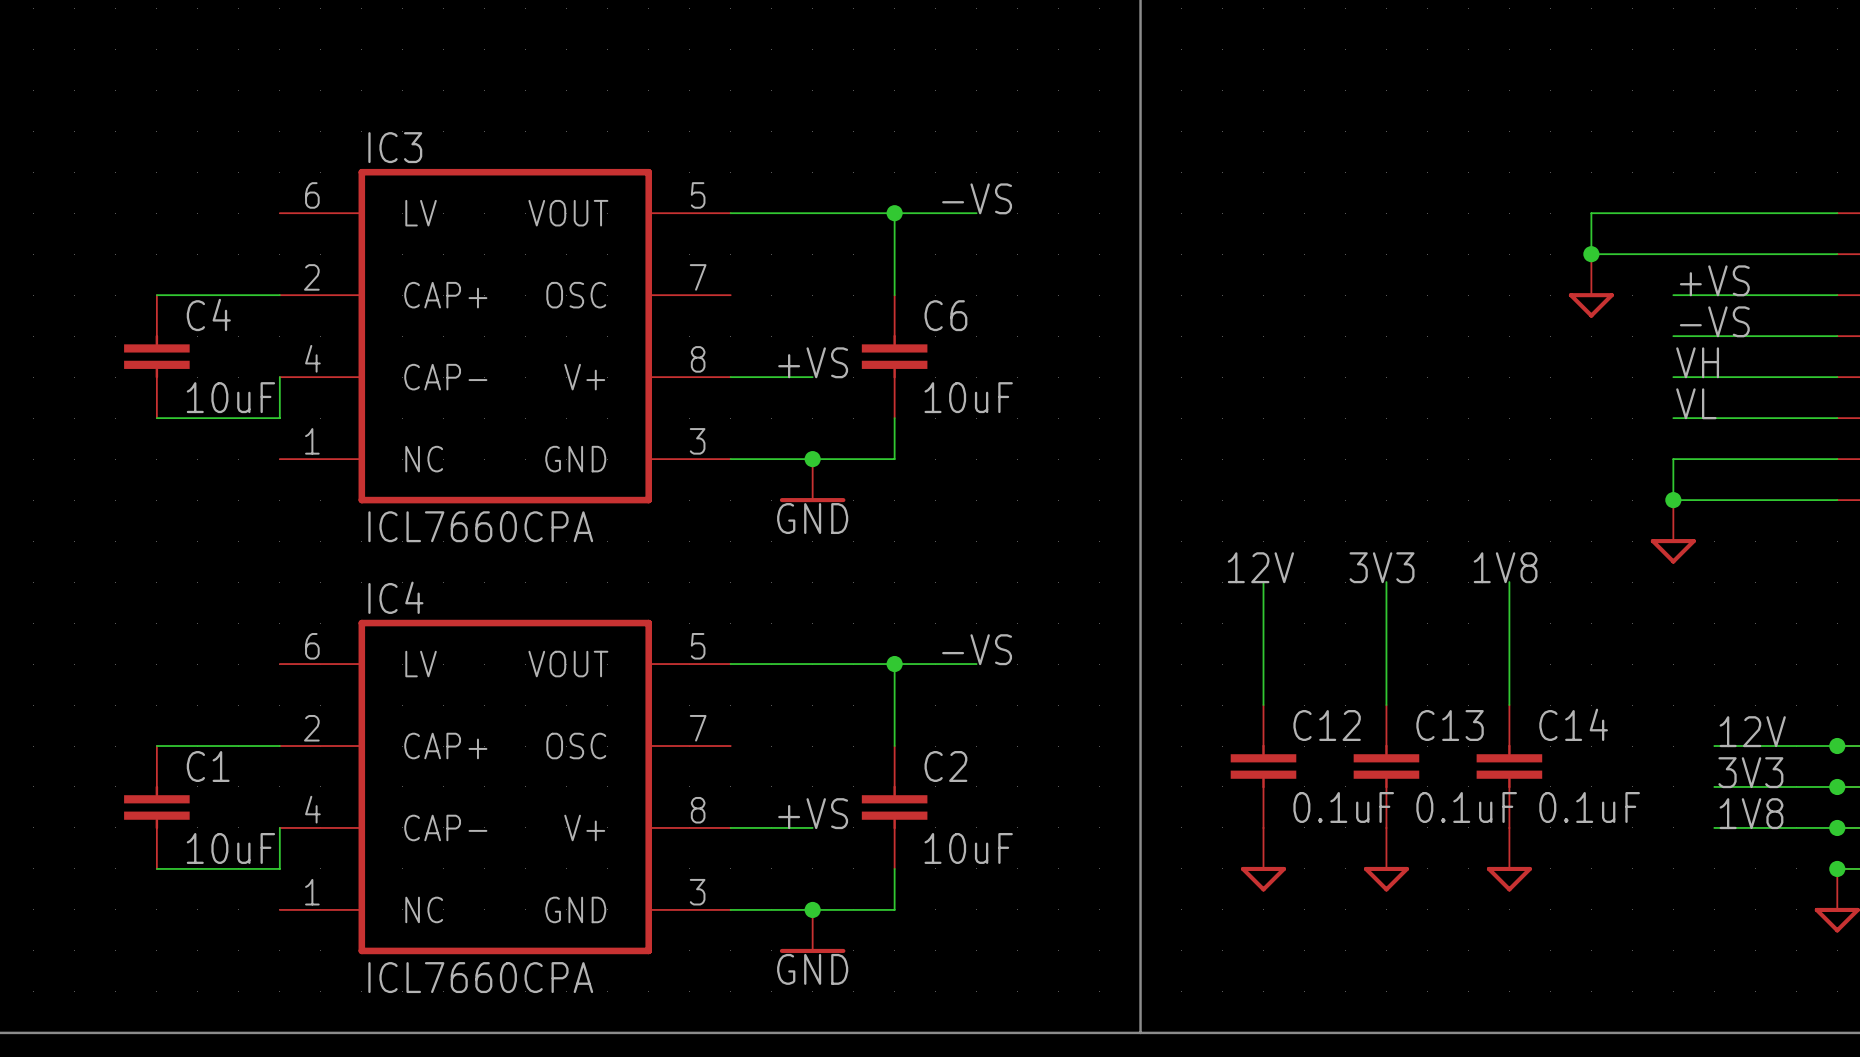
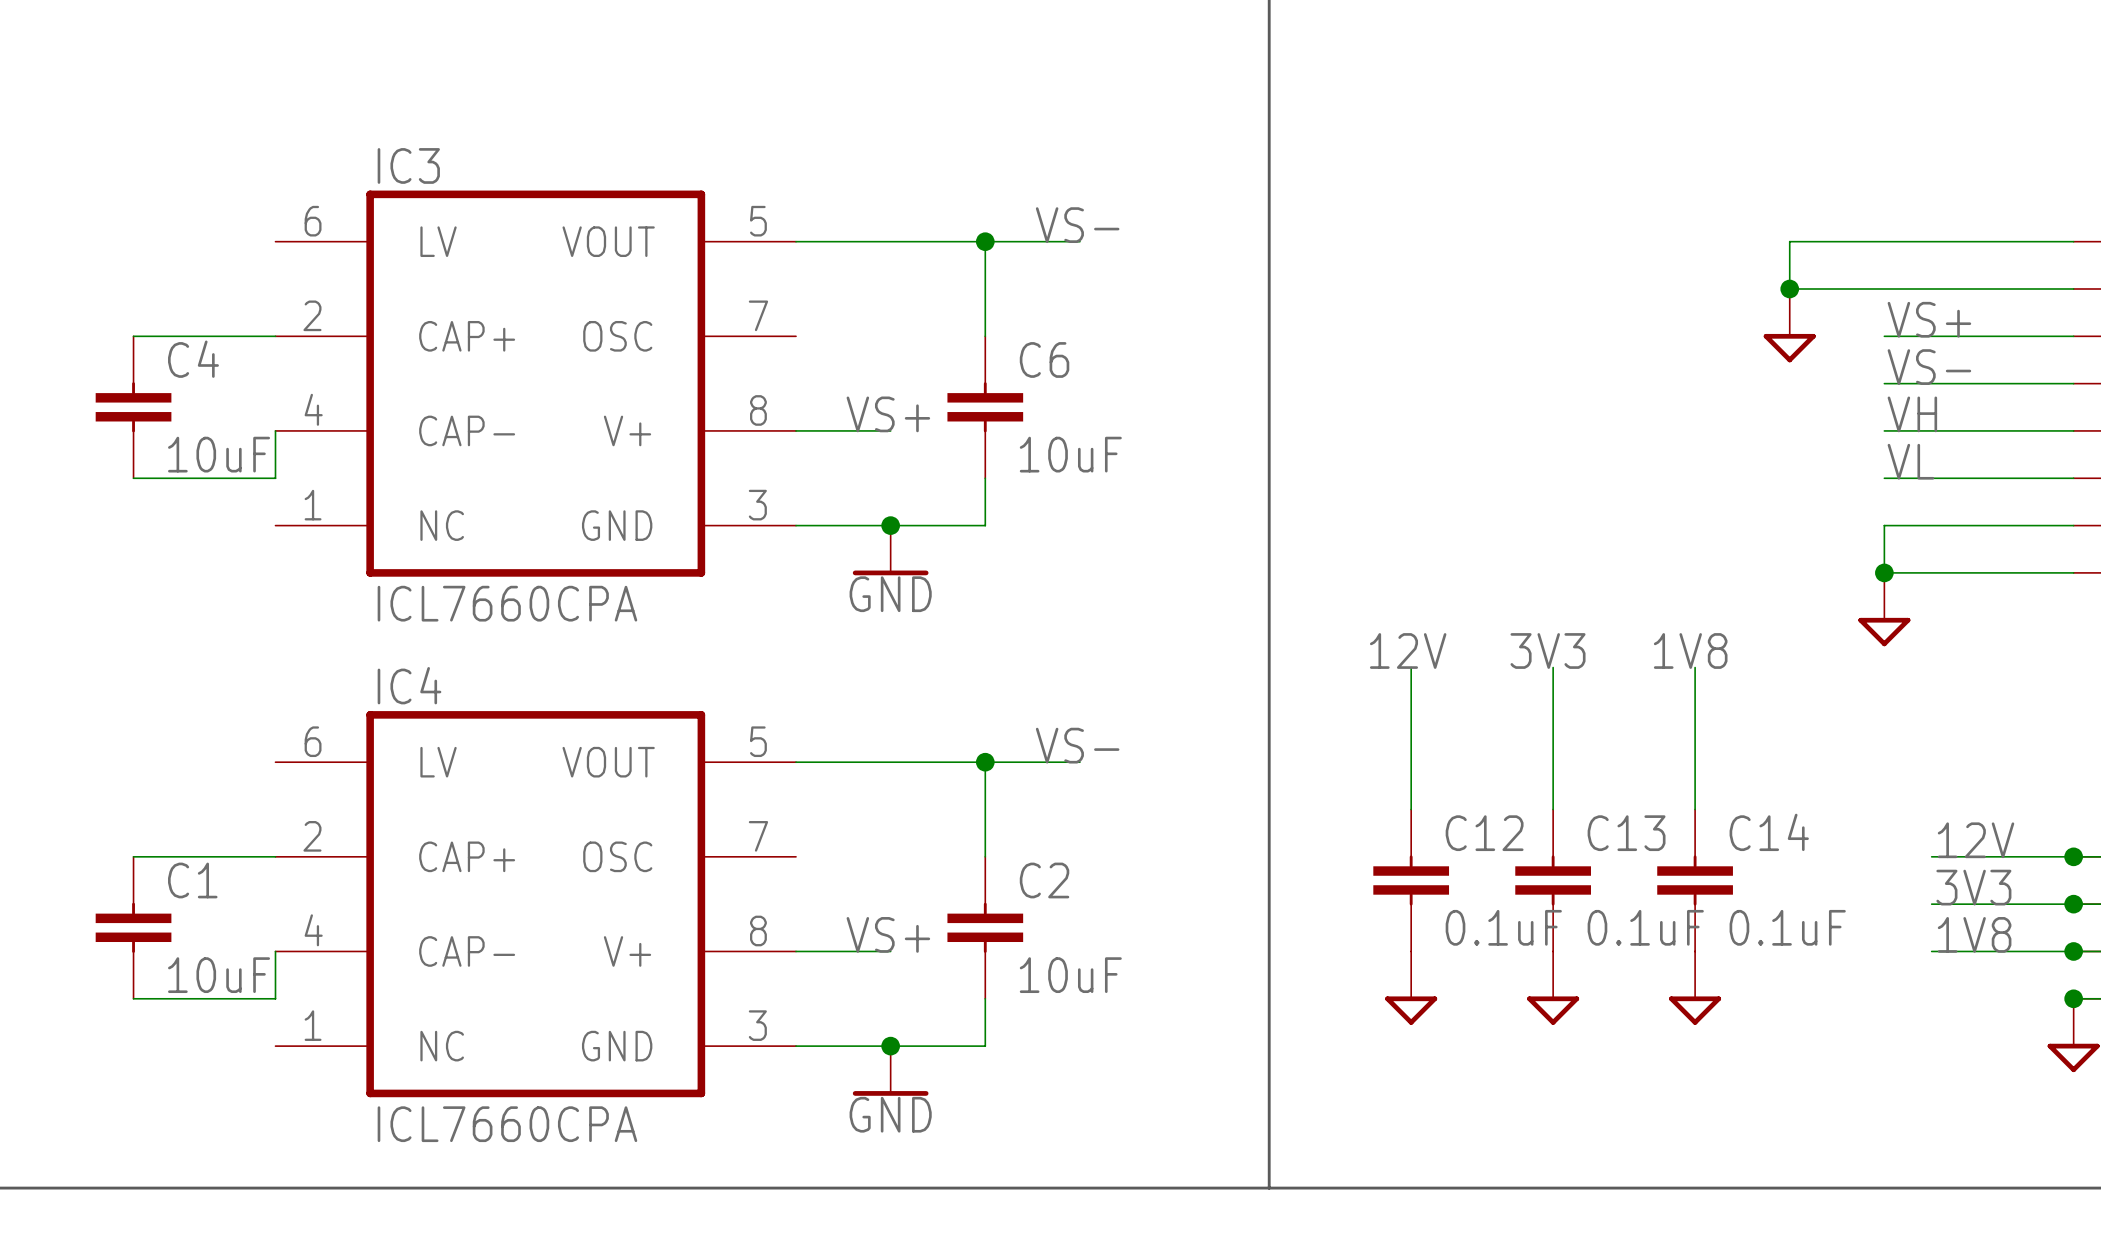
label: -VS (977, 198) -> VS- (1077, 225)
label: +VS (1714, 280) -> VS+ (1929, 319)
label: -VS (1714, 321) -> VS- (1929, 367)
label: +VS (813, 362) -> VS+ (888, 414)
label: -VS (977, 649) -> VS- (1077, 745)
label: +VS (813, 813) -> VS+ (888, 934)

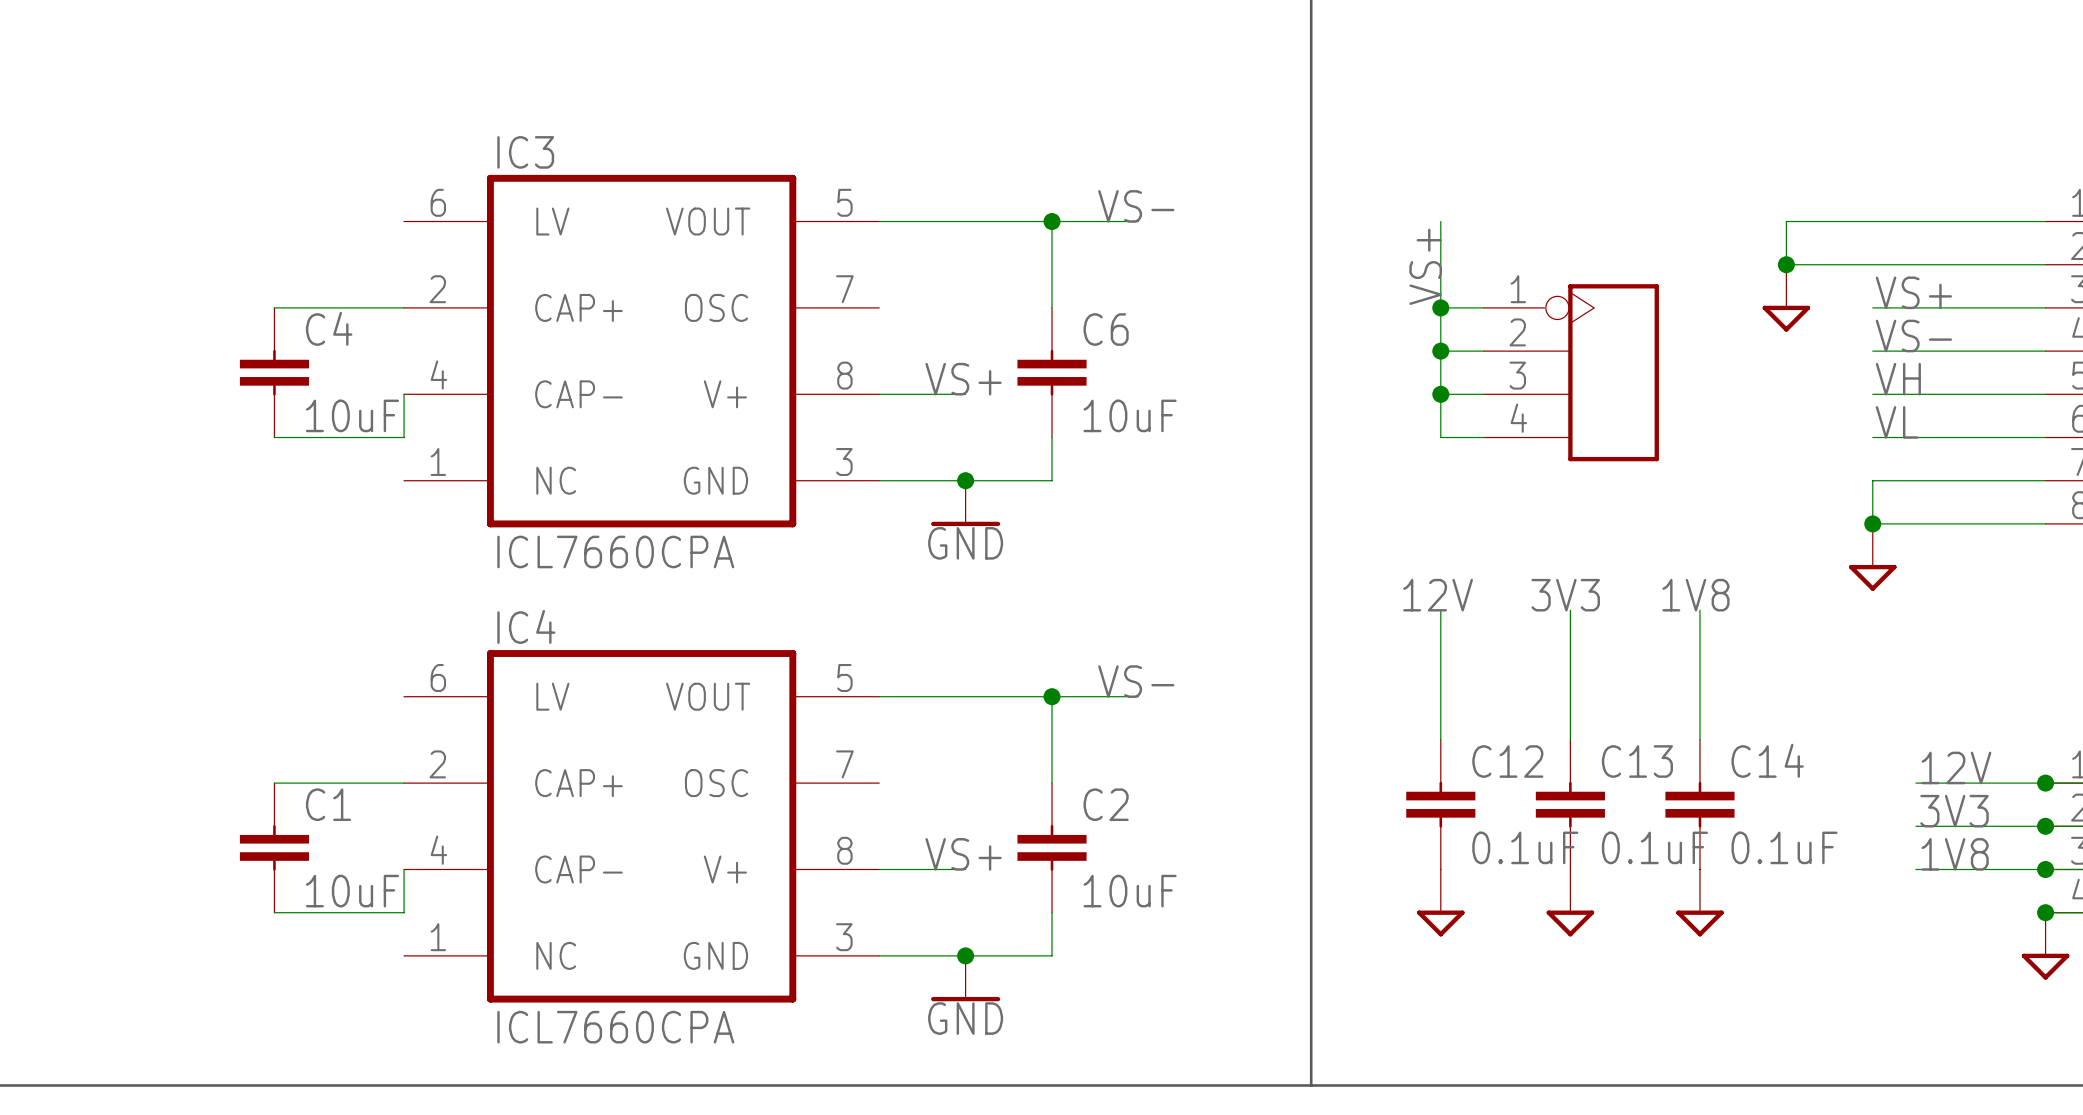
wire: none -> (1440, 221) (1440, 437) (1483, 437)
label: none -> VS+ (1425, 266)
wire: none -> (1440, 307) (1483, 307)
junction: none -> (1440, 307)
wire: none -> (1440, 351) (1483, 351)
junction: none -> (1440, 351)
part: none -> (1571, 372)
wire: none -> (1440, 394) (1483, 394)
junction: none -> (1440, 394)

